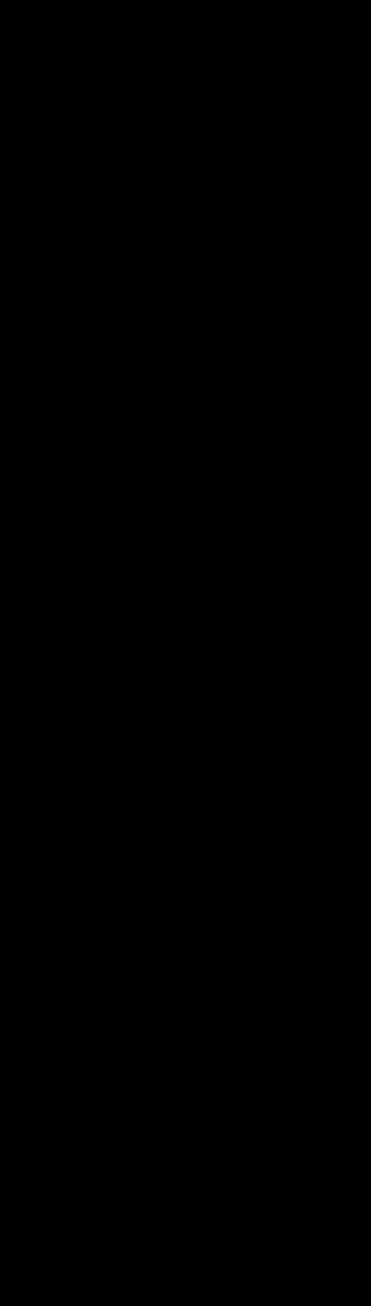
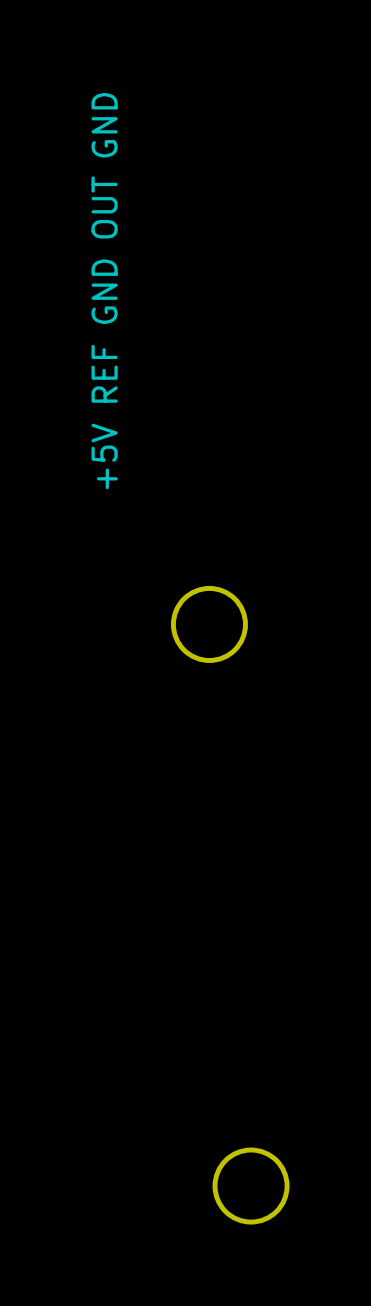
text: none -> GND (104, 125)
text: none -> OUT (104, 207)
text: none -> GND (104, 291)
text: none -> REF (104, 373)
text: none -> +5V (104, 456)
round board edge: none -> [170, 585, 248, 663]
round board edge: none -> [212, 1147, 290, 1225]

